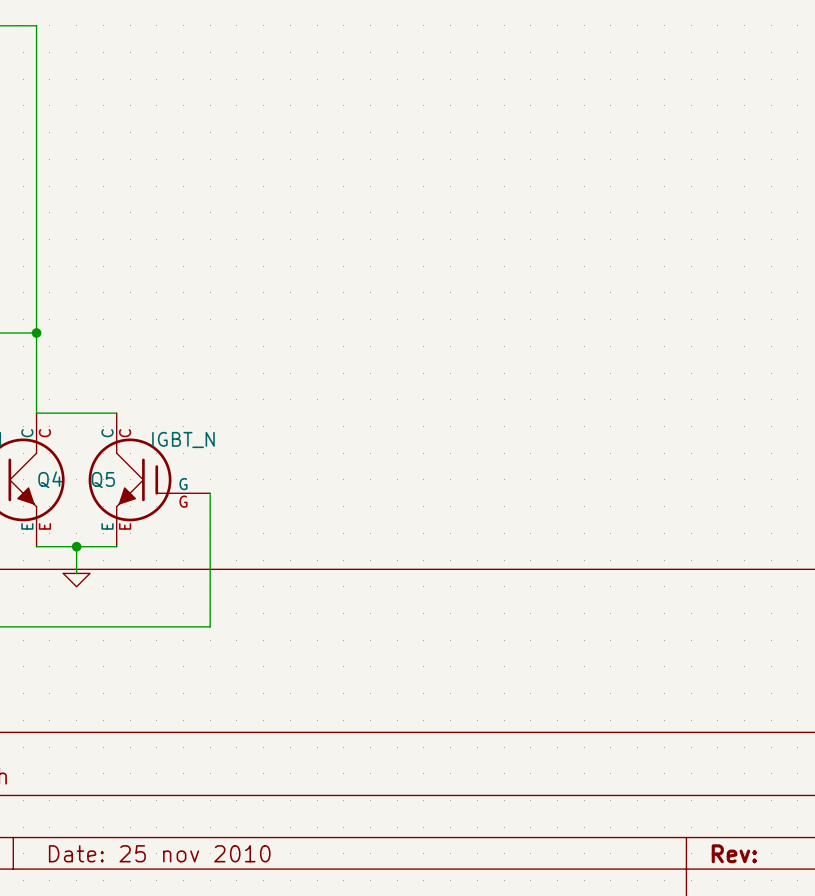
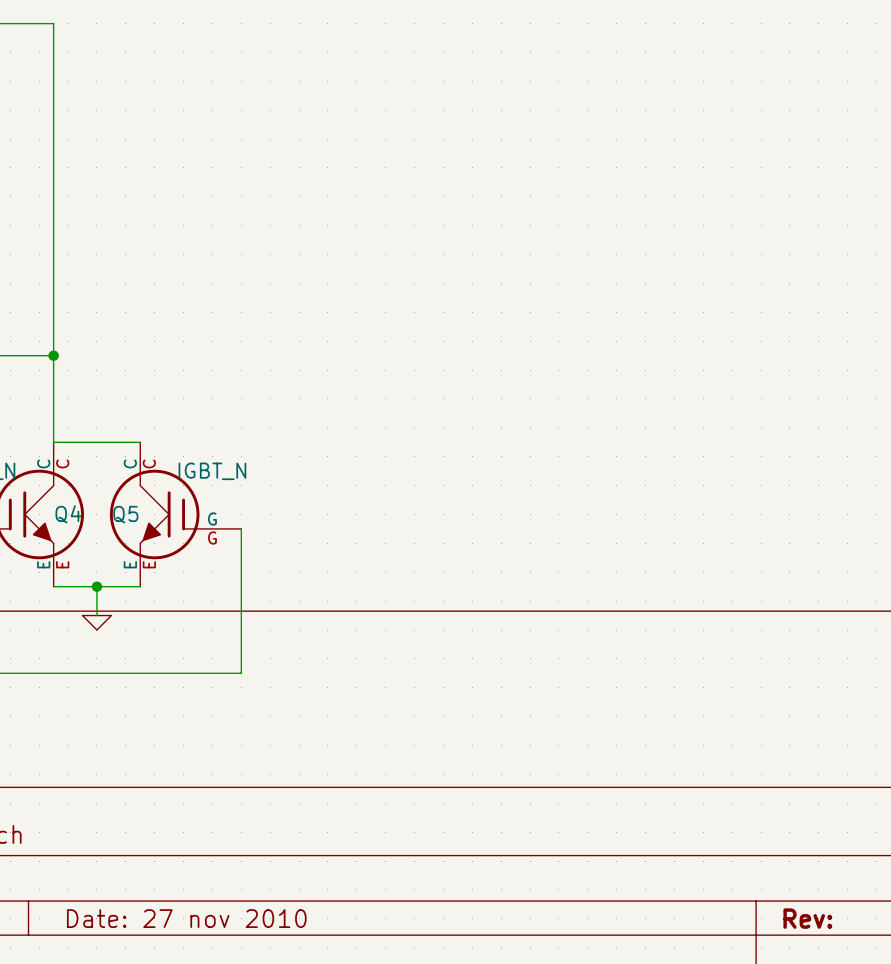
title block: Date: 25 nov 2010 (159, 853) -> Date: 27 nov 2010 (186, 918)

